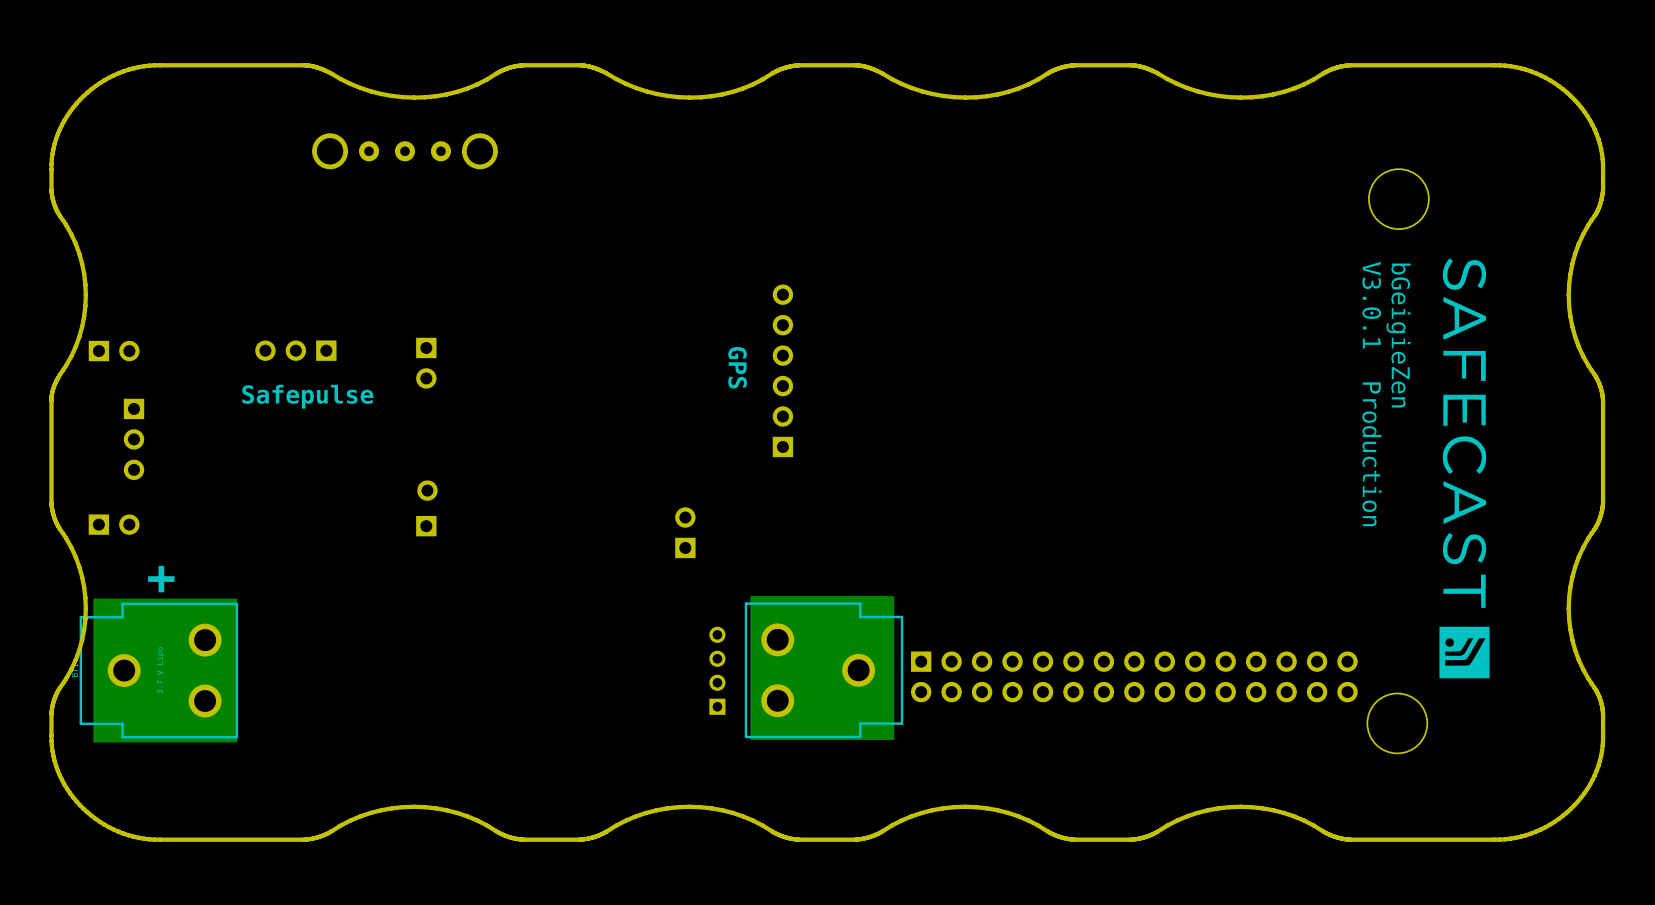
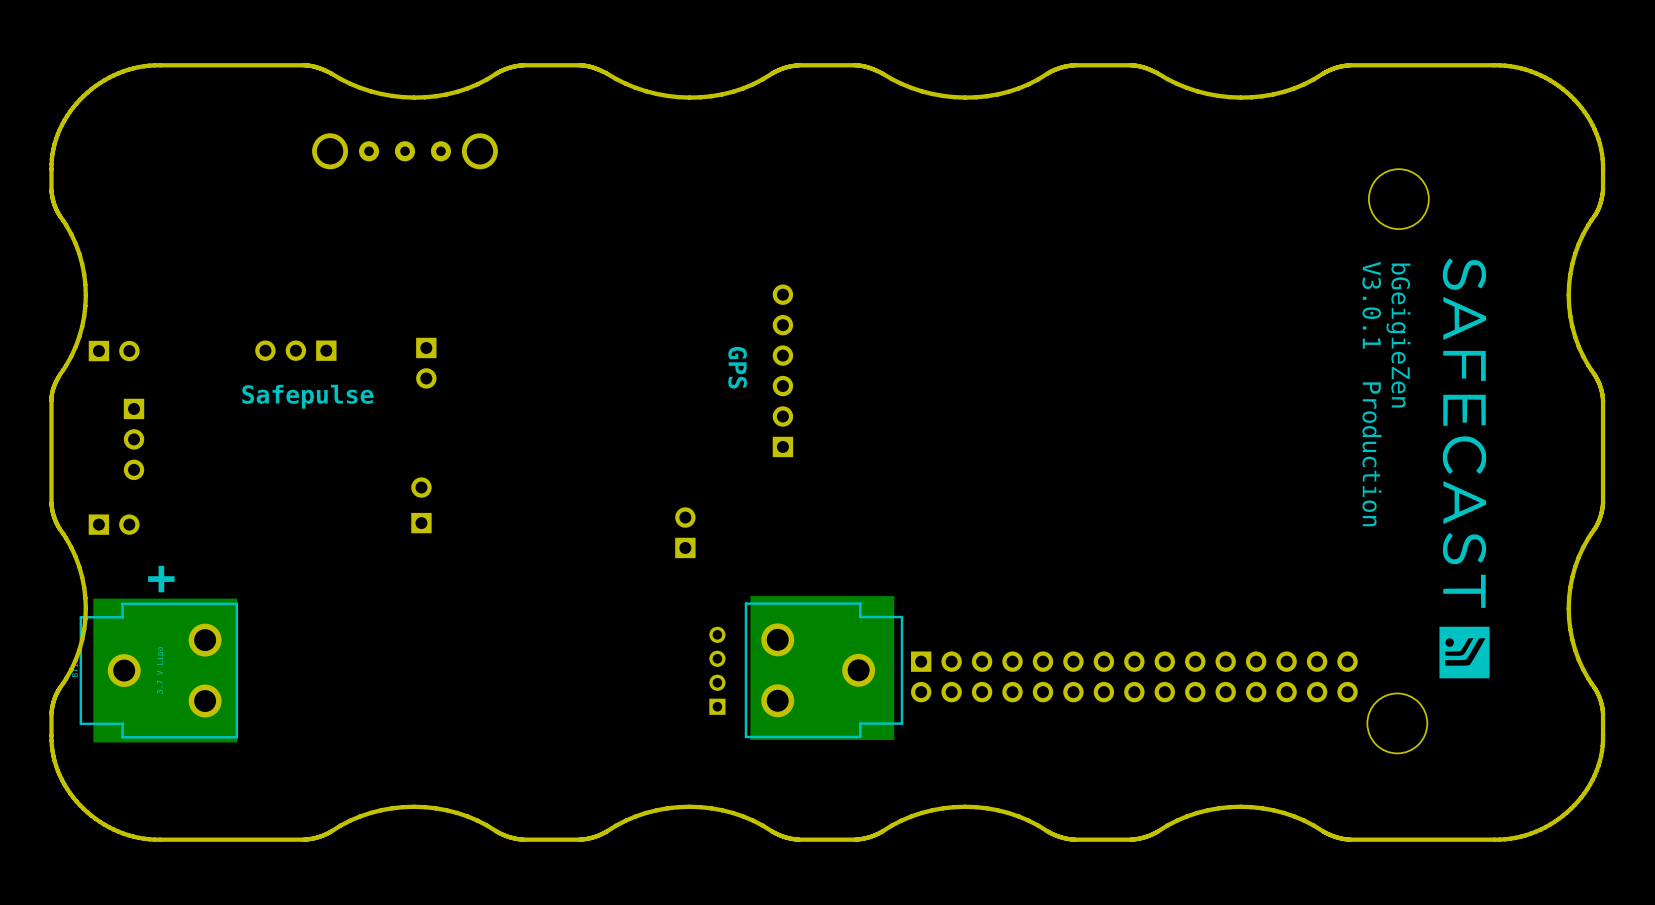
part footprint: [416, 480, 438, 537] -> [411, 477, 432, 534]

